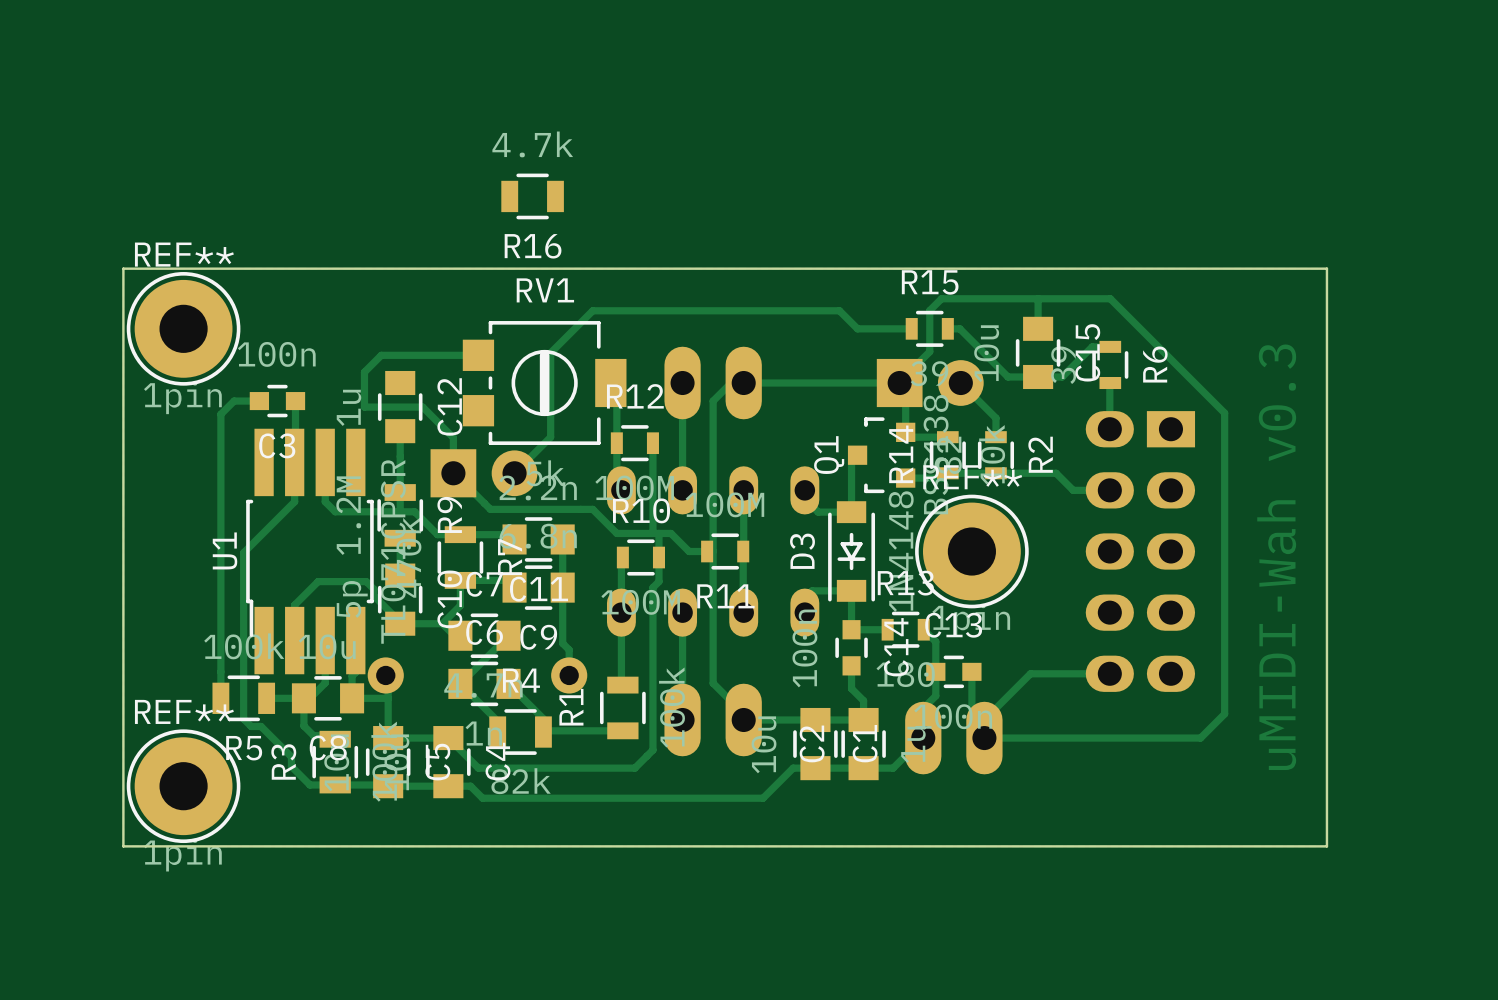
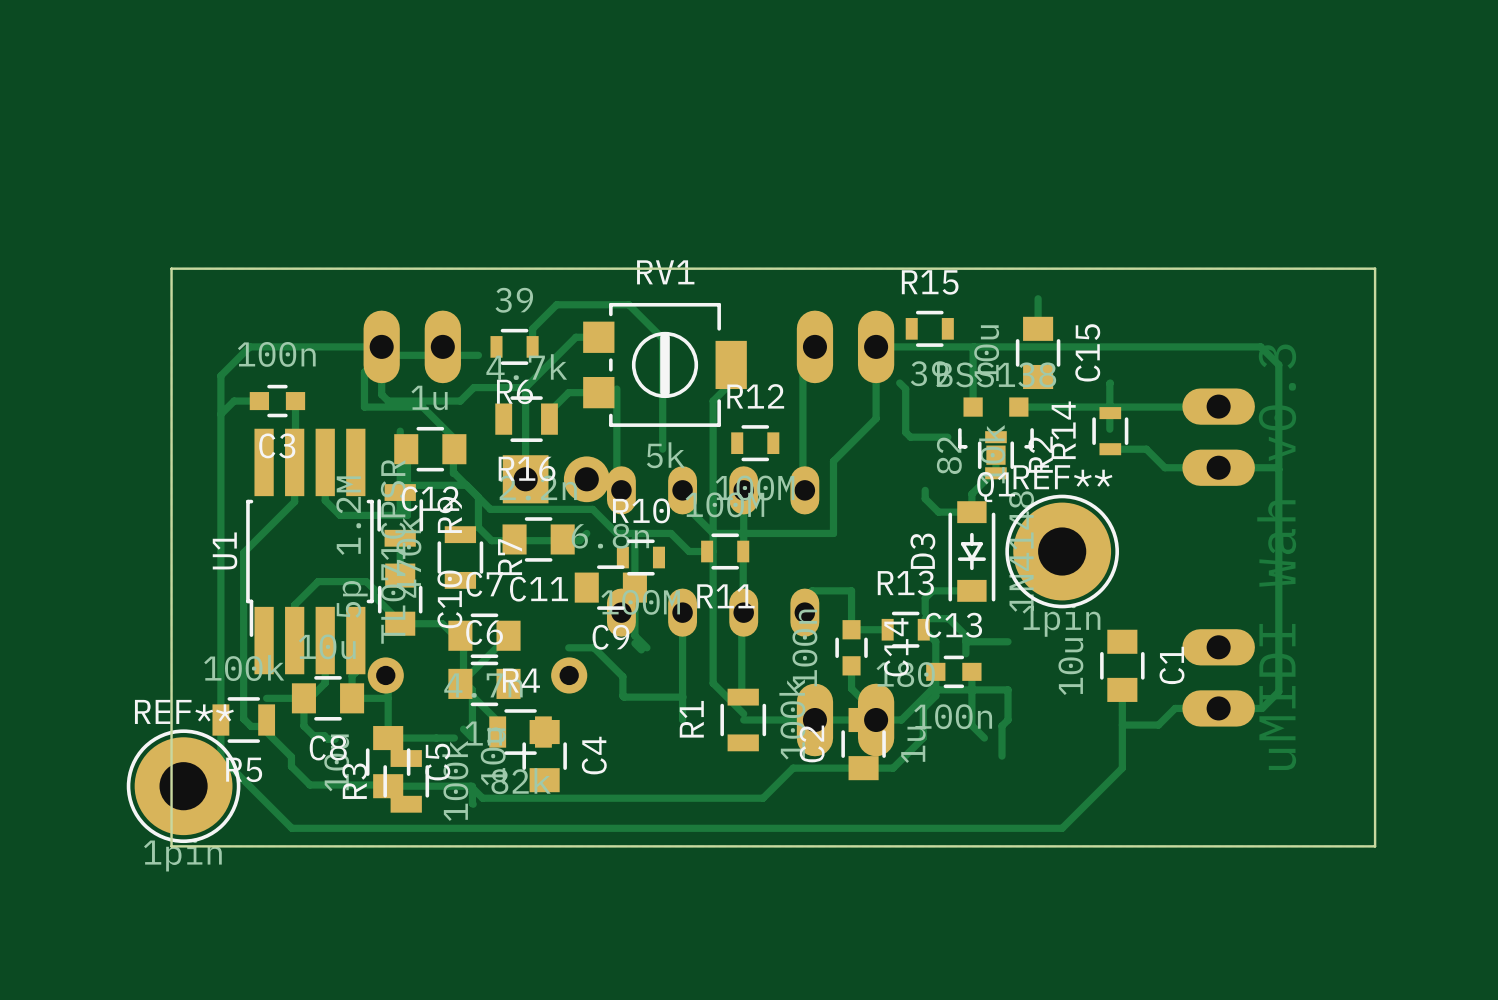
R16 position: (532, 196) -> (526, 419)
board edge: (171, 268) (123, 268) (123, 846) (171, 846) -> (171, 268) (171, 846)
board edge: (1326, 268) (1326, 846) -> (1326, 268) (1375, 268) (1375, 846) (1326, 846)
REF**: 1pin (183, 328) -> none
track: (911, 328) (857, 328) (839, 310) (592, 310) (550, 352) (550, 437) (514, 473) -> none
track: (947, 328) (959, 328) (1008, 376) (1062, 376) (1092, 346) -> (689, 503) (689, 509) (713, 533) (833, 533) (833, 461) (876, 418) (876, 346) (1092, 346)
track: none -> (598, 337) (575, 337) (525, 387)
part: none -> (412, 346)
track: none -> (532, 346) (532, 328) (556, 304) (628, 304) (662, 338) (662, 449)
track: none -> (814, 346) (802, 358) (802, 496)
track: none -> (973, 346) (973, 407)
track: none -> (1110, 346) (1260, 346) (1278, 364) (1278, 691) (1262, 708) (1175, 708) (1158, 725) (1122, 725)
R6 rotation: 0° (1110, 364) -> 90° clockwise (514, 346)
R6 position: (1110, 364) -> (514, 346)
track: (743, 370) (755, 383) (899, 383) (929, 351) (929, 310) (941, 298) (1110, 298) (1224, 413) (1224, 713) (1200, 738) (984, 738) (984, 719) (1030, 673) (1109, 673) -> none
RV1 position: (544, 383) -> (665, 364)
track: (682, 383) (682, 490) -> none
part position: (713, 383) -> (845, 346)
part: (930, 383) -> none
track: (960, 383) (995, 418) (995, 437) -> none
track: none -> (525, 387) (473, 387) (460, 401) (388, 401) (381, 394) (381, 346) (249, 346) (220, 375) (220, 414)
track: none -> (525, 387) (525, 479)
track: none -> (598, 392) (568, 392) (549, 411) (549, 419)
track: none -> (1218, 406) (1018, 407)
C12 rotation: 0° (400, 407) -> 90° clockwise (430, 449)
C12 position: (400, 407) -> (430, 449)
part: none -> (1218, 437)
R12 position: (634, 443) -> (755, 443)
track: (652, 443) (652, 533) -> none
track: none -> (1110, 449) (1146, 449) (1164, 467) (1277, 467) (1278, 469)
track: (857, 455) (851, 461) (851, 512) (818, 512) (804, 498) (804, 490) -> none
Q1 rotation: 0° (881, 455) -> 90° counterclockwise (995, 431)
Q1 position: (881, 455) -> (995, 431)
R14 position: (947, 455) -> (1110, 431)
track: none -> (995, 455) (995, 469) (971, 493) (971, 512) (938, 512) (925, 498) (925, 490)
part position: (483, 473) -> (556, 479)
track: (905, 478) (943, 478) (947, 473) (1056, 473) (1073, 490) (1109, 490) -> none
track: none -> (407, 484) (466, 485) (478, 497) (478, 527) (491, 540) (579, 540) (586, 533)
track: (325, 500) (335, 511) (414, 511) (437, 534) (507, 534) -> (325, 500) (340, 515) (407, 515) (406, 449)
track: (658, 533) (658, 581) (652, 587) (652, 750) (634, 768) (478, 768) (448, 738) -> none
track: (562, 539) (562, 643) (569, 649) (569, 675) -> none
track: none -> (634, 539) (634, 635) (646, 647)
D3 position: (851, 551) -> (971, 551)
REF** position: (971, 551) -> (1062, 551)
part: (1140, 551) -> none
track: (622, 557) (622, 685) -> none
track: (507, 580) (460, 580) (460, 605) (442, 623) -> none
C9 position: (538, 587) -> (610, 587)
track: none -> (971, 590) (932, 590) (925, 598) (925, 612)
track: none -> (741, 618) (743, 697)
track: none -> (925, 618) (948, 618) (965, 635) (965, 653)
track: none -> (965, 641) (1008, 641)
track: none -> (634, 643) (641, 649)
track: none -> (466, 647) (463, 647) (463, 681) (472, 689) (472, 732)
track: none -> (568, 647) (593, 647) (622, 676) (624, 697) (683, 697)
part: none -> (1218, 677)
track: (508, 683) (543, 718) (543, 732) (622, 730) -> none
track: none -> (1122, 689) (1122, 768) (1062, 828) (291, 828) (220, 757) (220, 698)
R5 position: (243, 698) -> (243, 720)
R1 position: (622, 707) -> (743, 720)
part: (713, 720) -> none
part: none -> (845, 720)
track: none -> (876, 720) (901, 720) (931, 689) (1008, 689) (1008, 720) (1001, 726) (1001, 756)
track: none -> (463, 729) (472, 738)
part: (953, 738) -> none
C1 position: (815, 744) -> (1122, 665)
R3 position: (335, 762) -> (406, 781)
C4 position: (448, 762) -> (544, 756)
track: none -> (472, 786) (473, 804)

